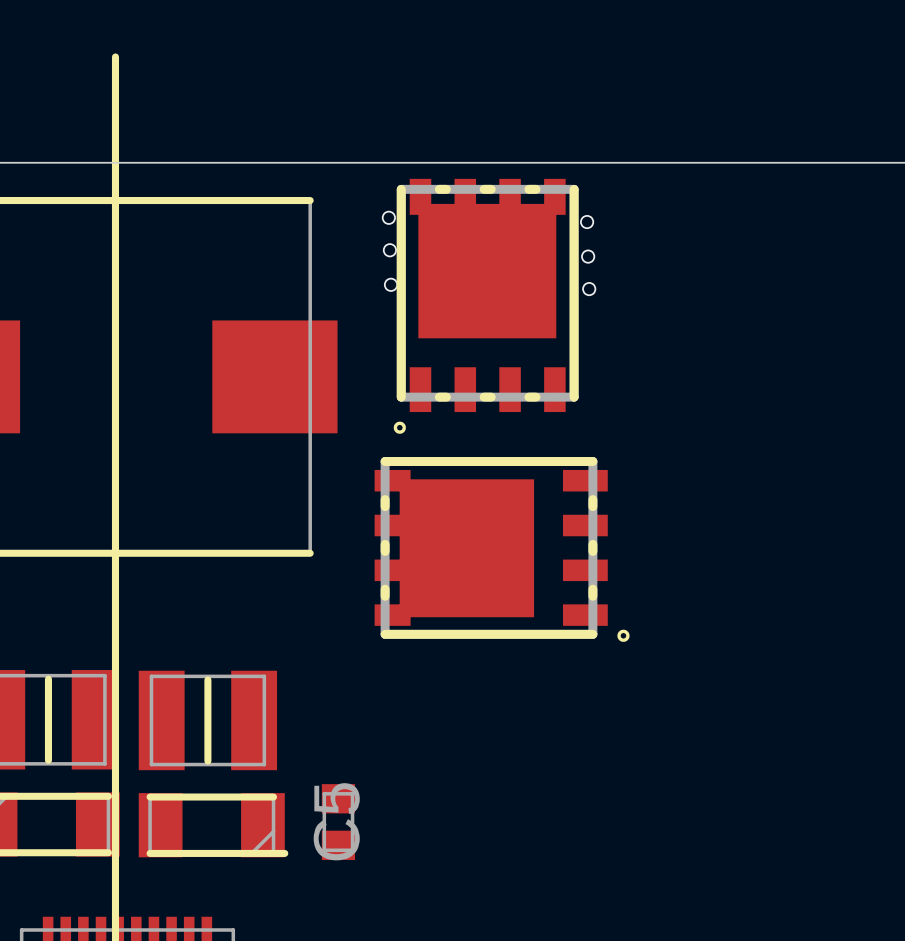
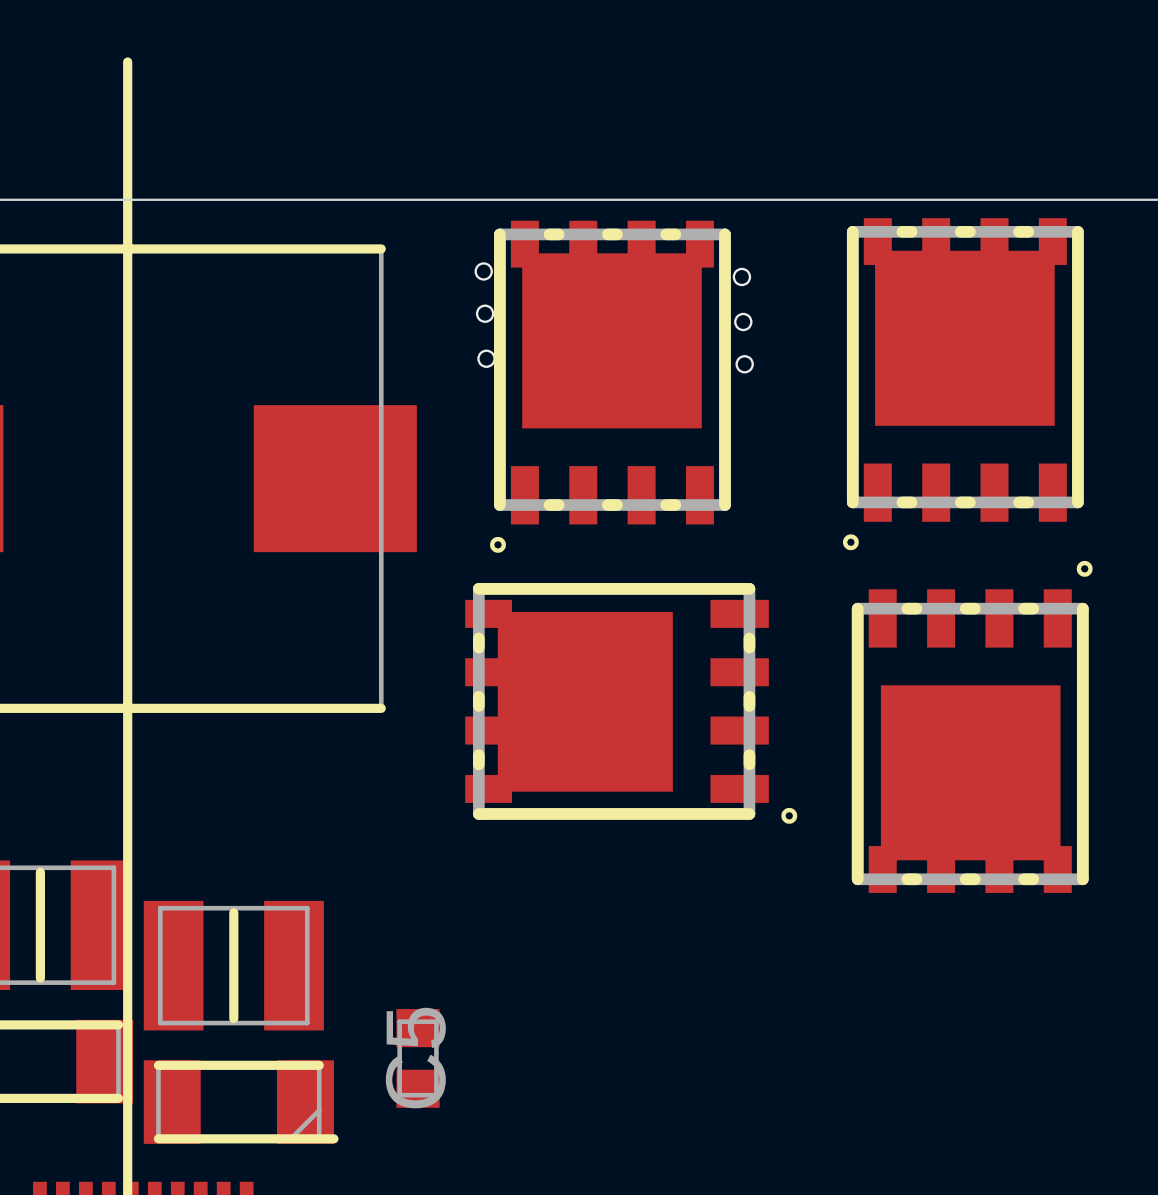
part: none -> (963, 384)
part: none -> (972, 726)
part position: (207, 720) -> (233, 965)
part position: (213, 825) -> (241, 1102)

